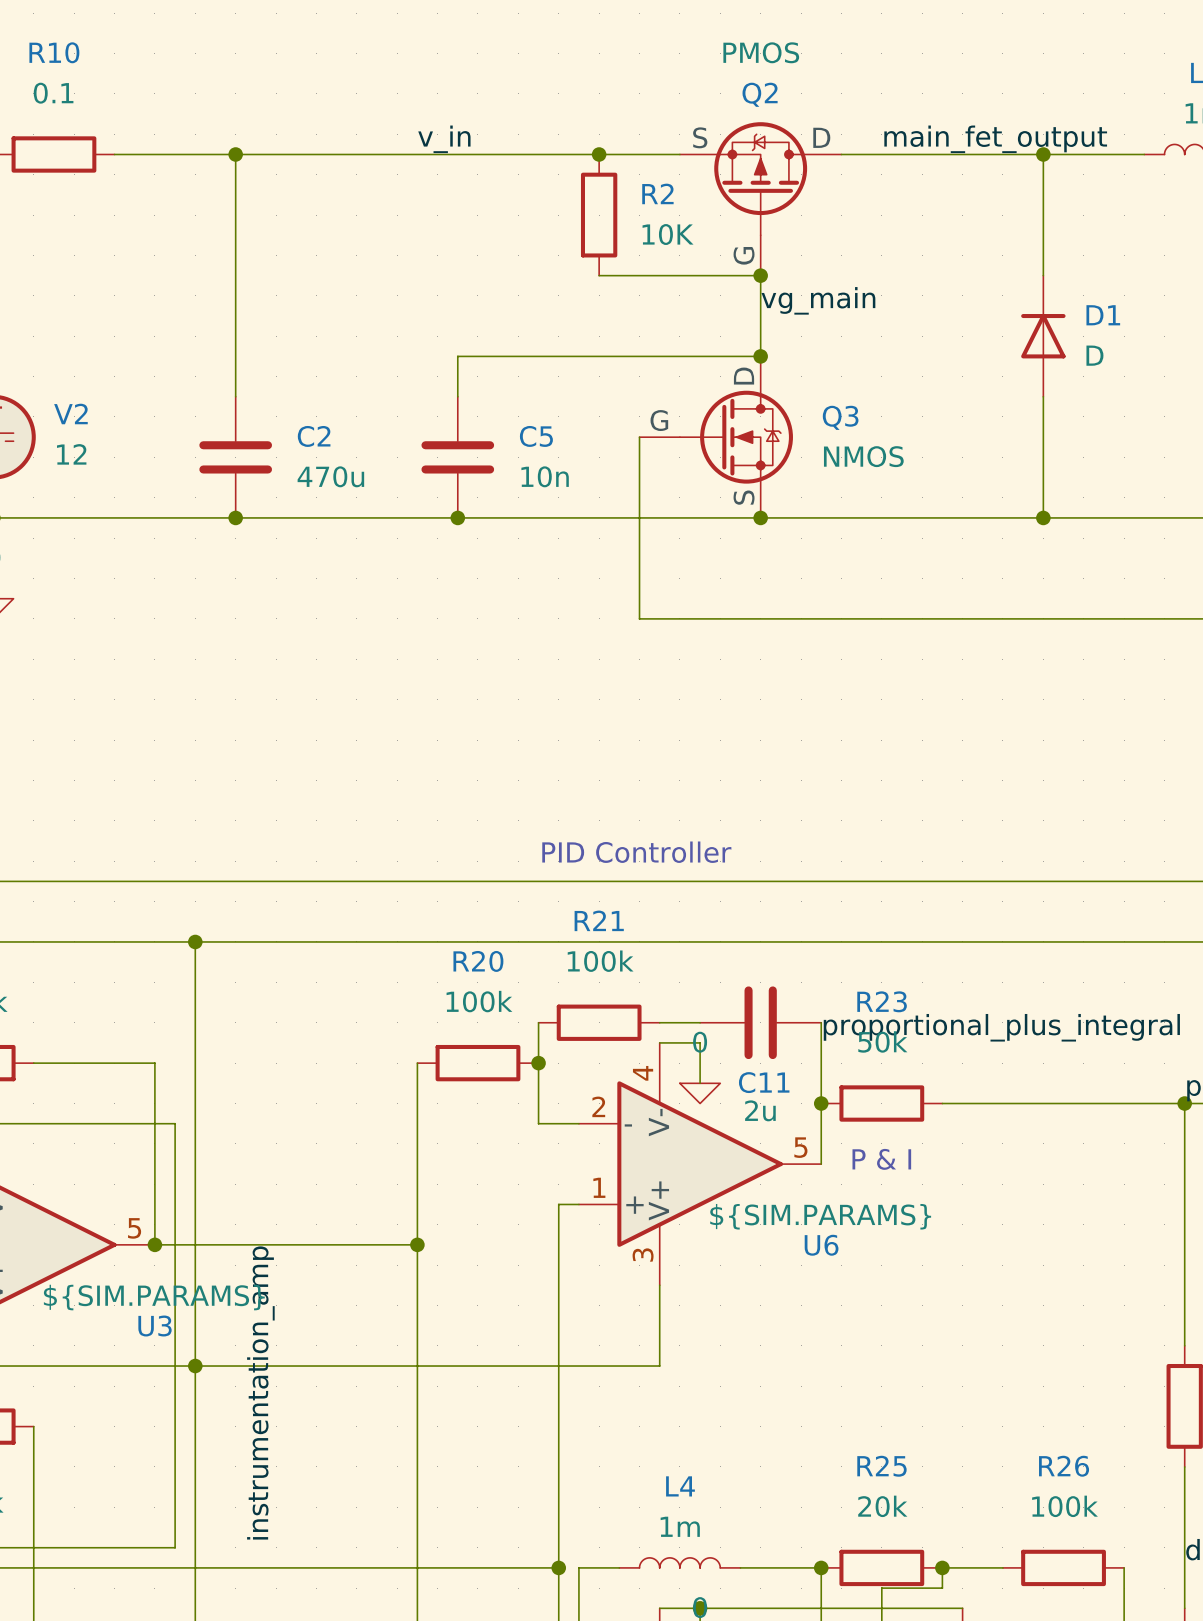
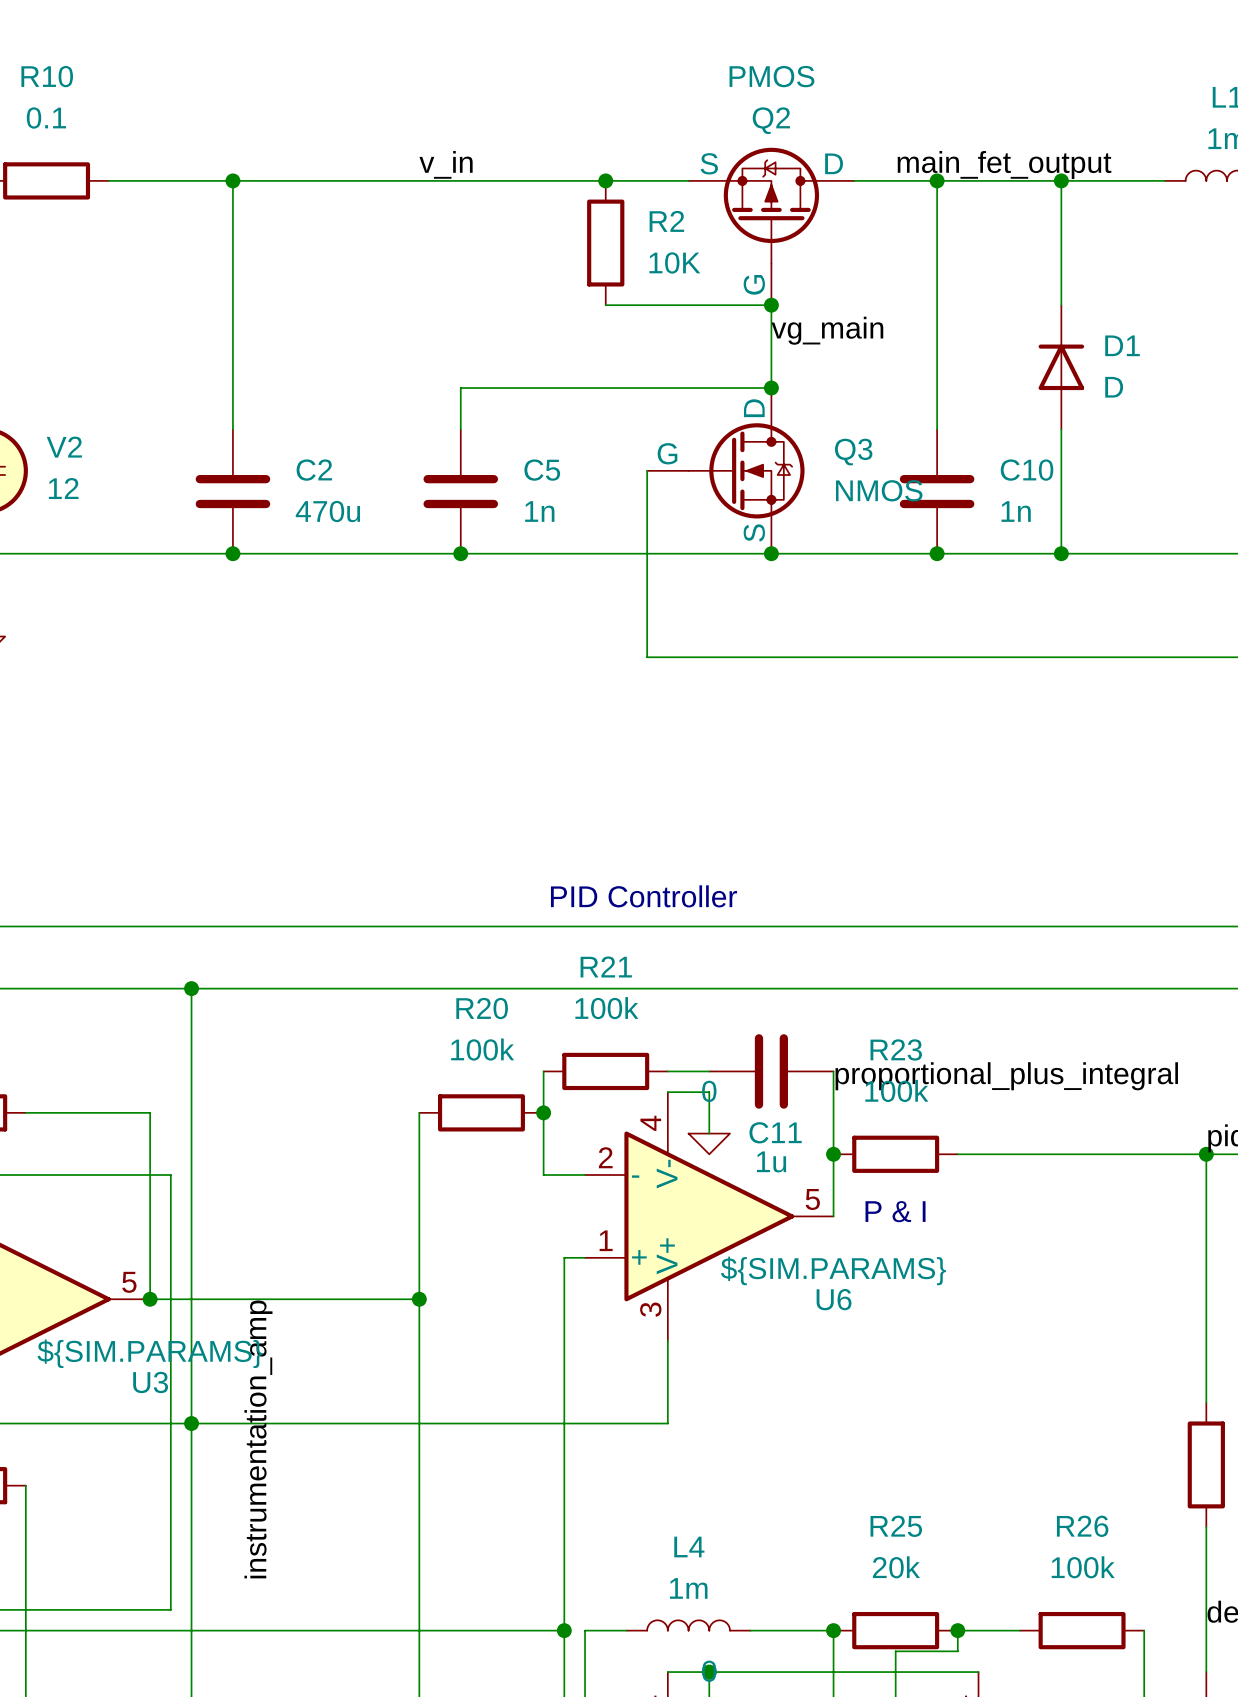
wire: none -> (937, 180) (937, 429)
junction: none -> (937, 180)
C10: none -> 1n (937, 491)
C5 value: 10n (545, 476) -> 1n (539, 511)
junction: none -> (937, 553)
R23 value: 50k (882, 1041) -> 100k (896, 1090)
C11 value: 2u (760, 1110) -> 1u (771, 1161)

